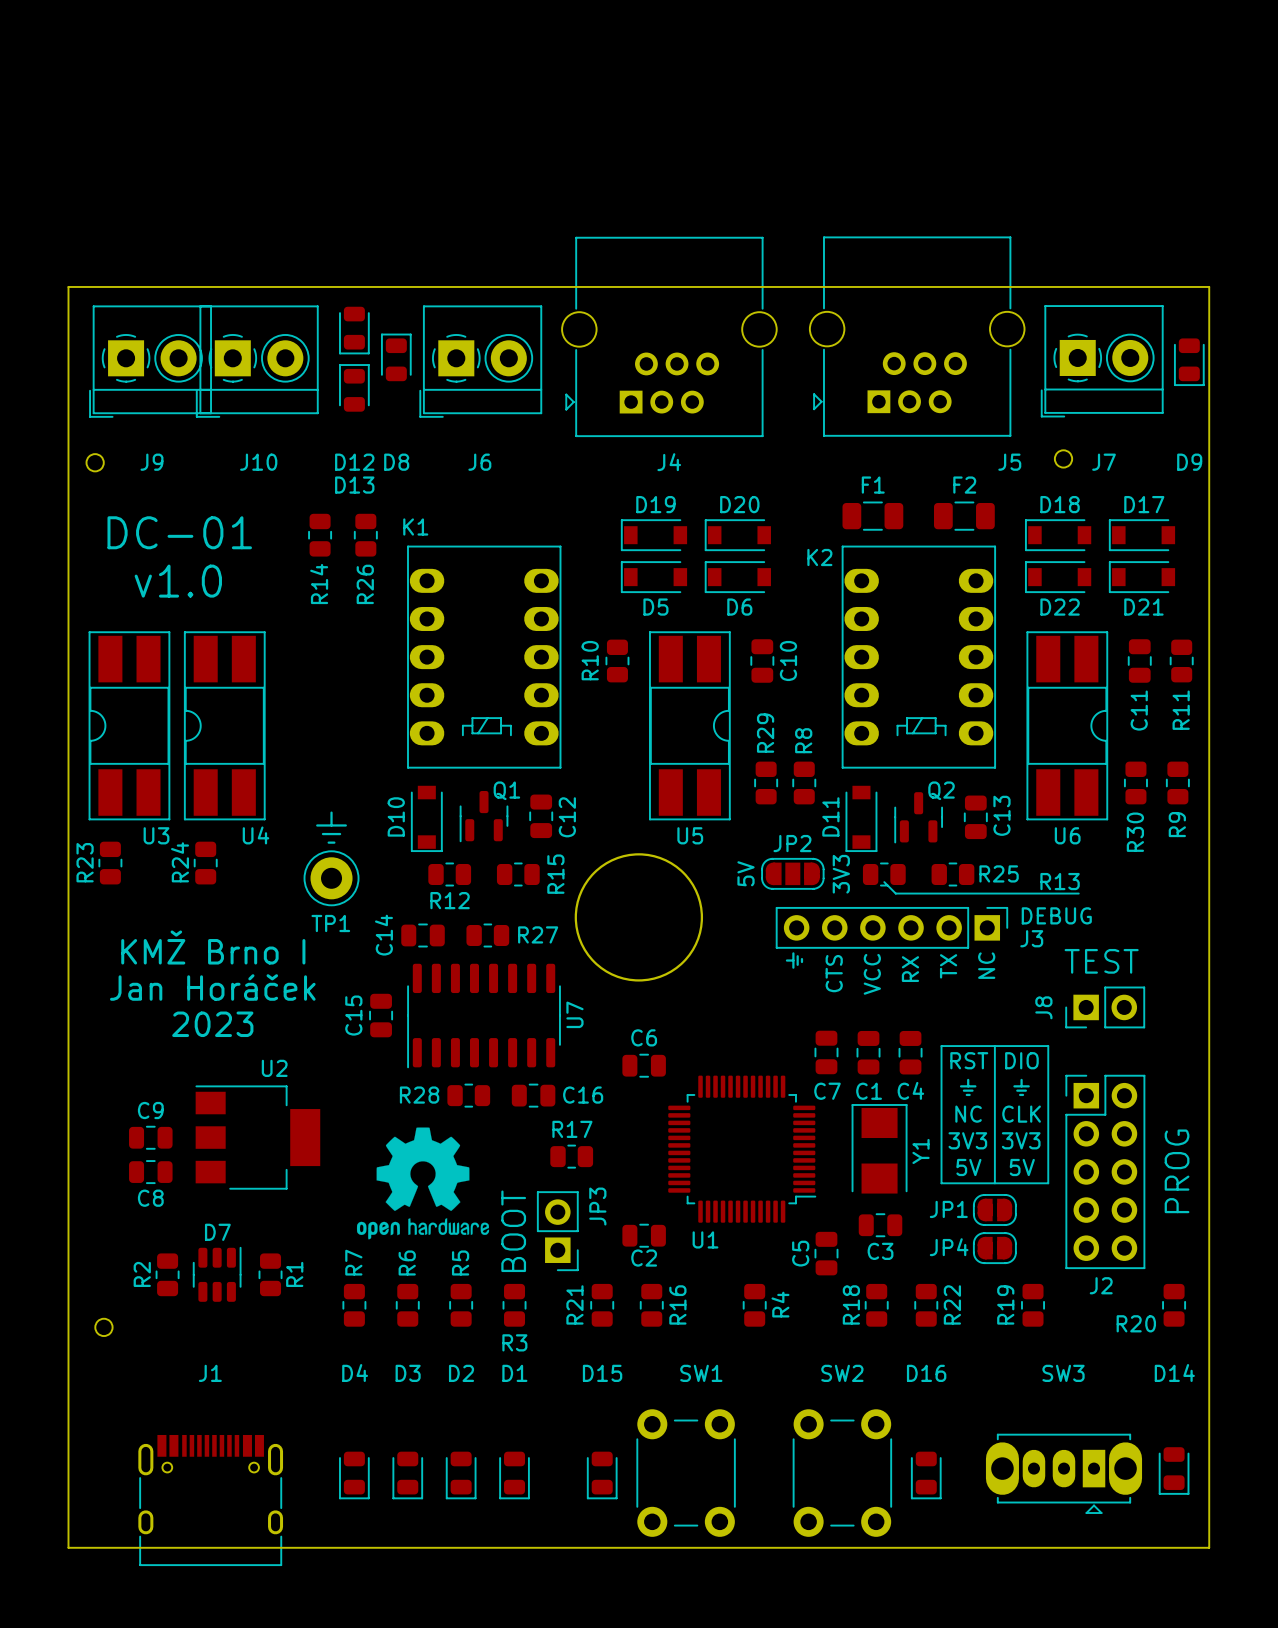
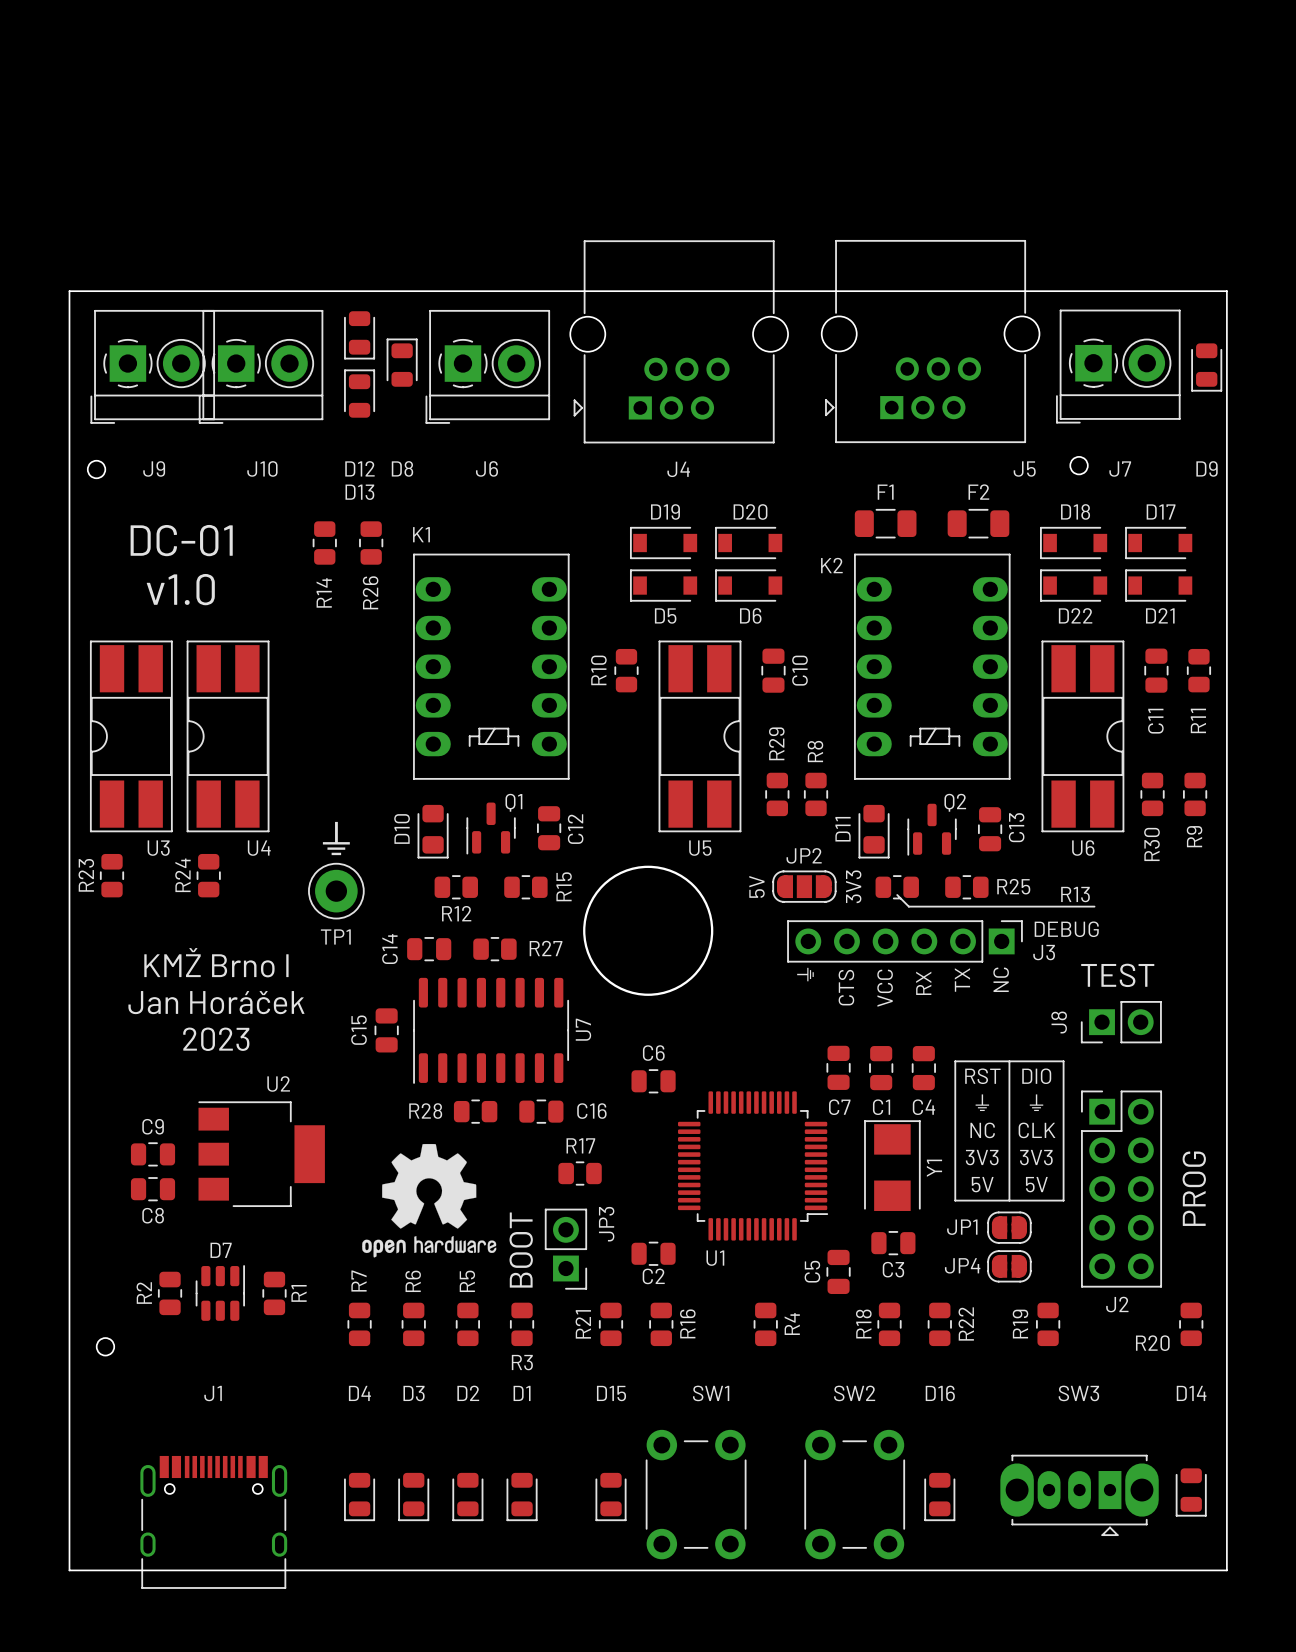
D10 footprint: [410, 785, 443, 852] -> [417, 804, 449, 859]
D11 footprint: [845, 785, 878, 852] -> [858, 804, 890, 859]

